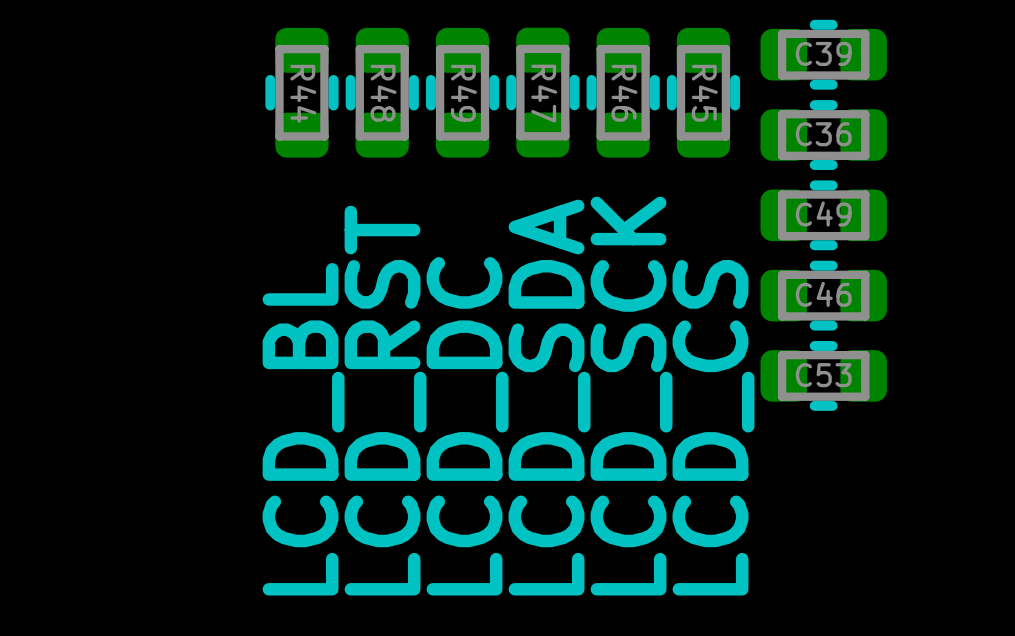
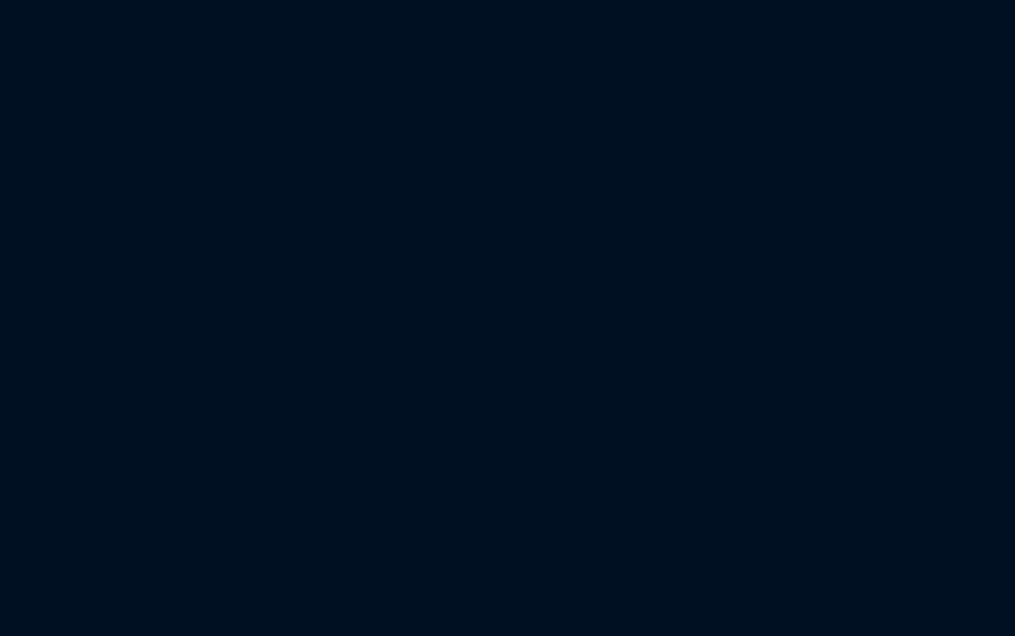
C39: (823, 54) -> none
R44: (301, 92) -> none
R48: (382, 92) -> none
R49: (462, 92) -> none
R47: (542, 92) -> none
R46: (623, 92) -> none
R45: (703, 92) -> none
C36: (823, 135) -> none
C49: (823, 215) -> none
C46: (823, 295) -> none
C53: (823, 375) -> none
text: LCD_SCK (631, 396) -> none
text: LCD_SDA (549, 397) -> none
text: LCD_RST (385, 400) -> none
text: LCD_DC (467, 426) -> none
text: LCD_CS (713, 427) -> none
text: LCD_BL (303, 429) -> none

